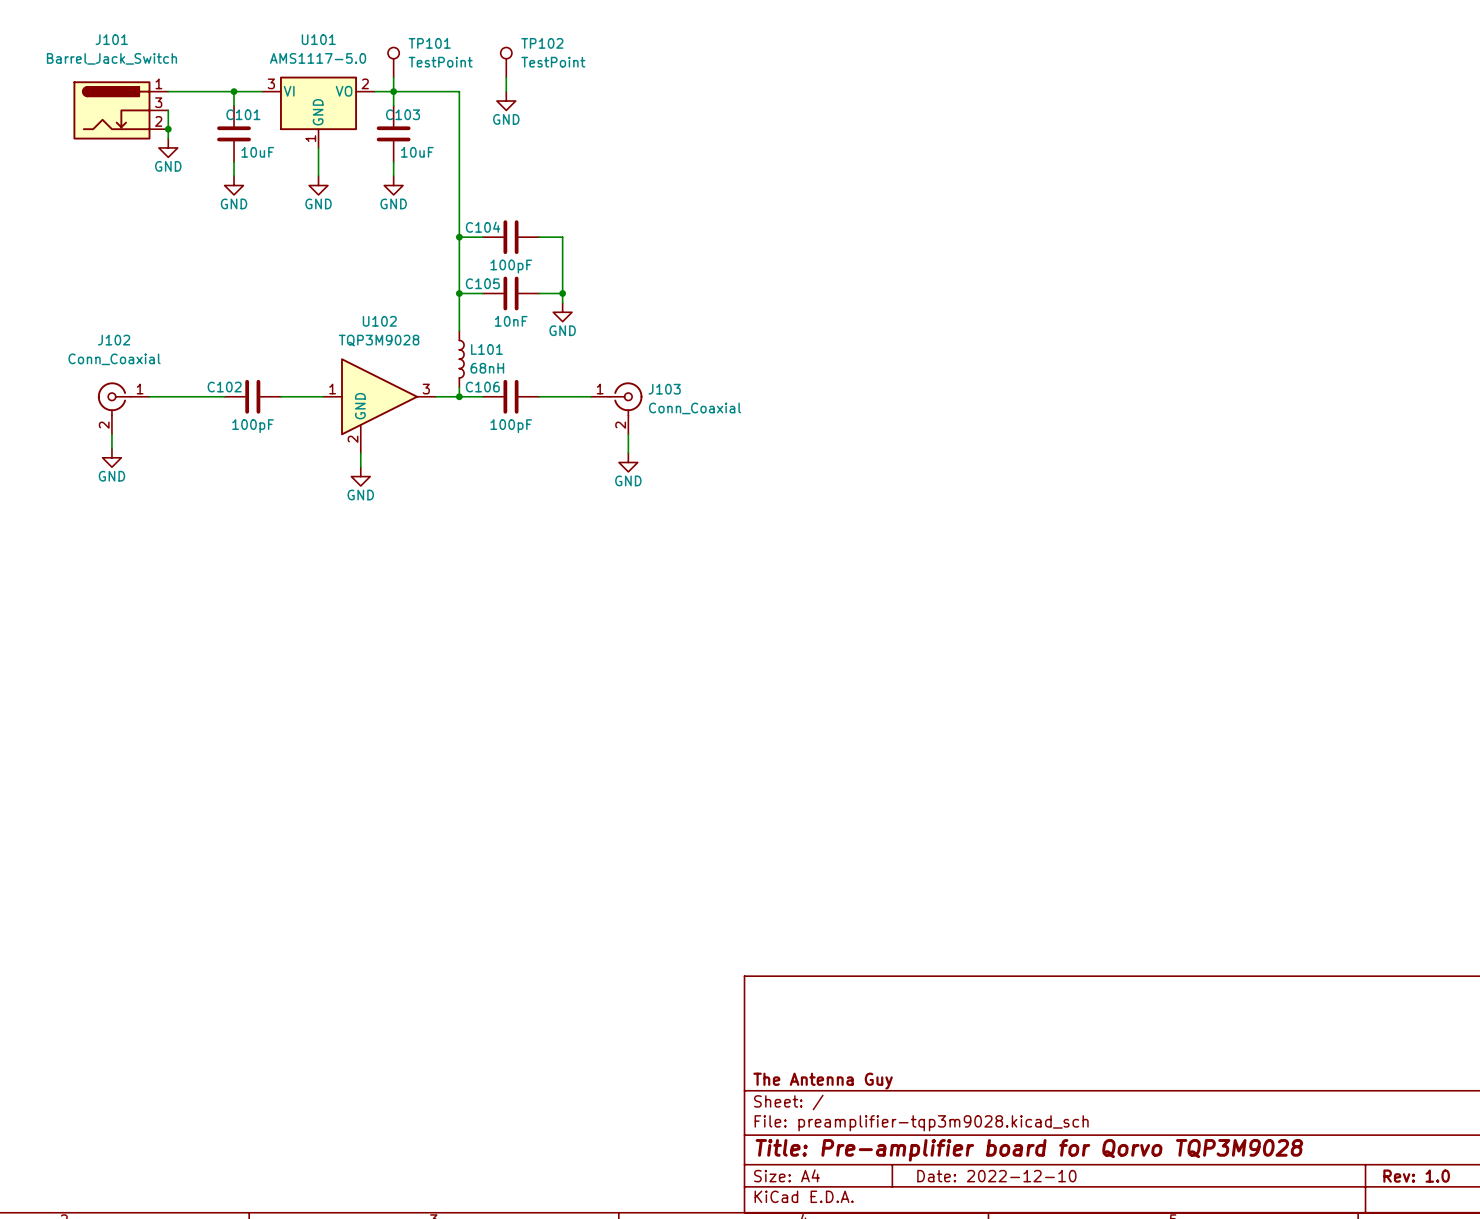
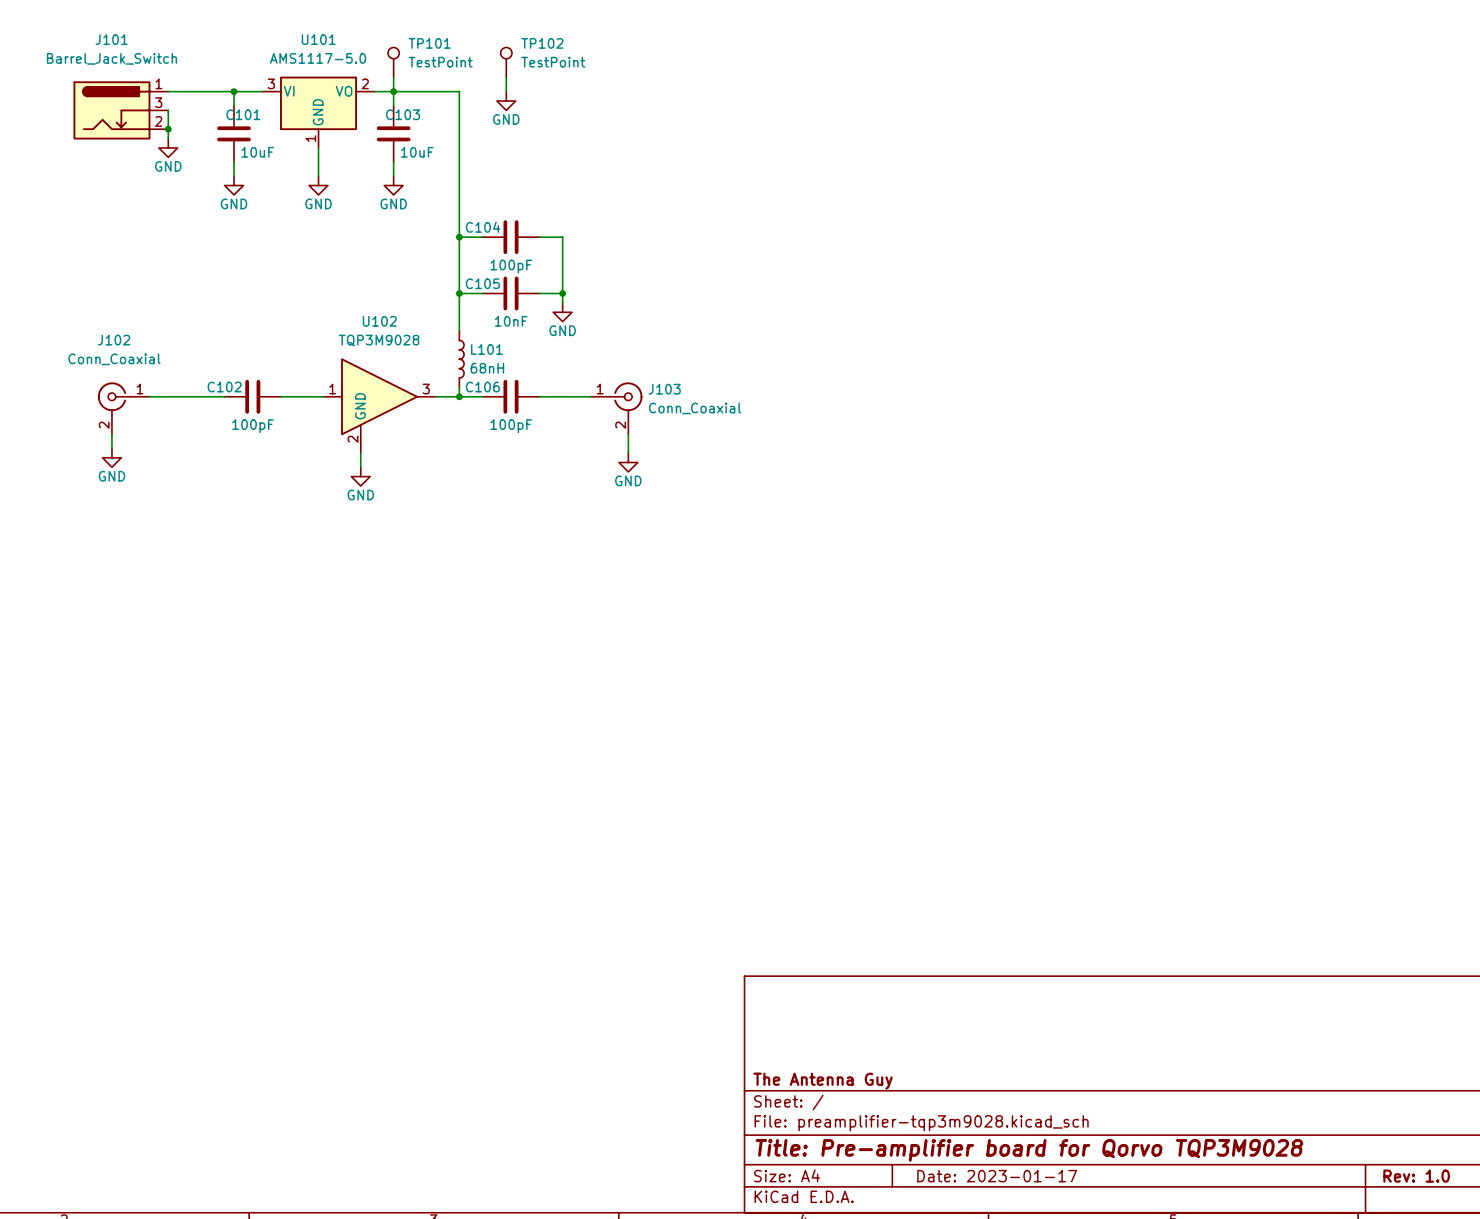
title block: Date: 2022-12-10 (996, 1176) -> Date: 2023-01-17 (997, 1176)

